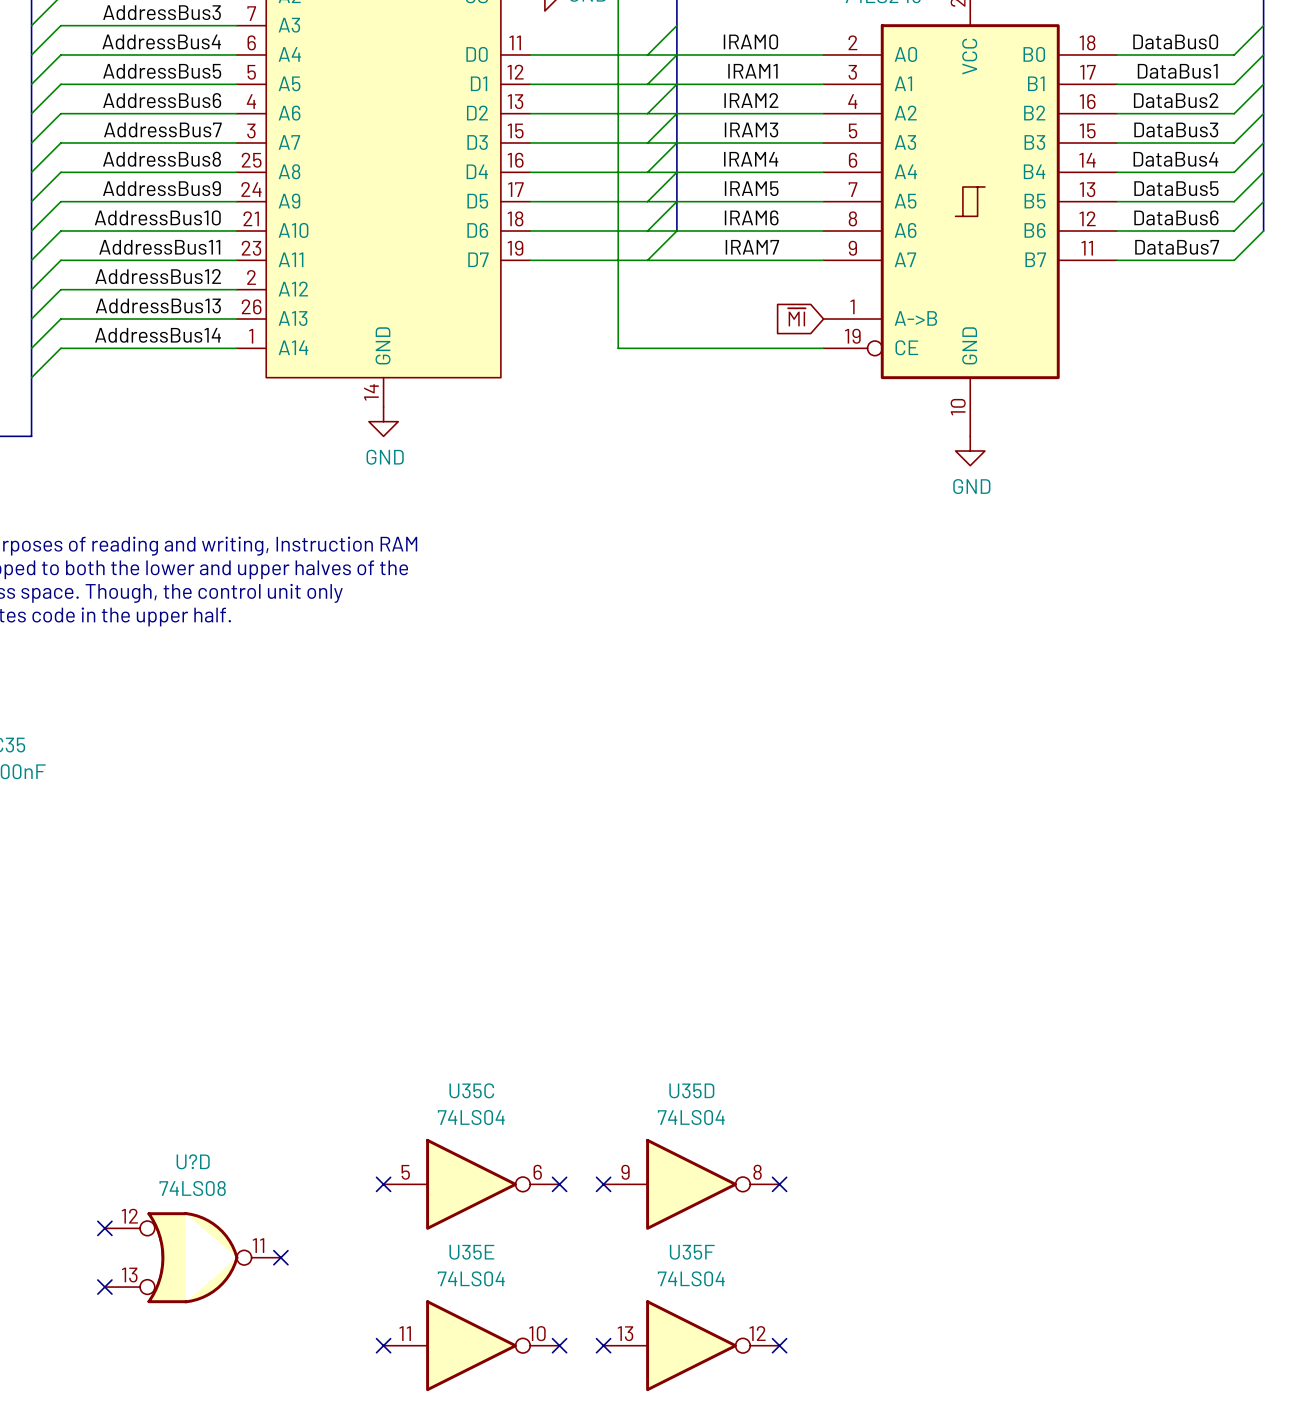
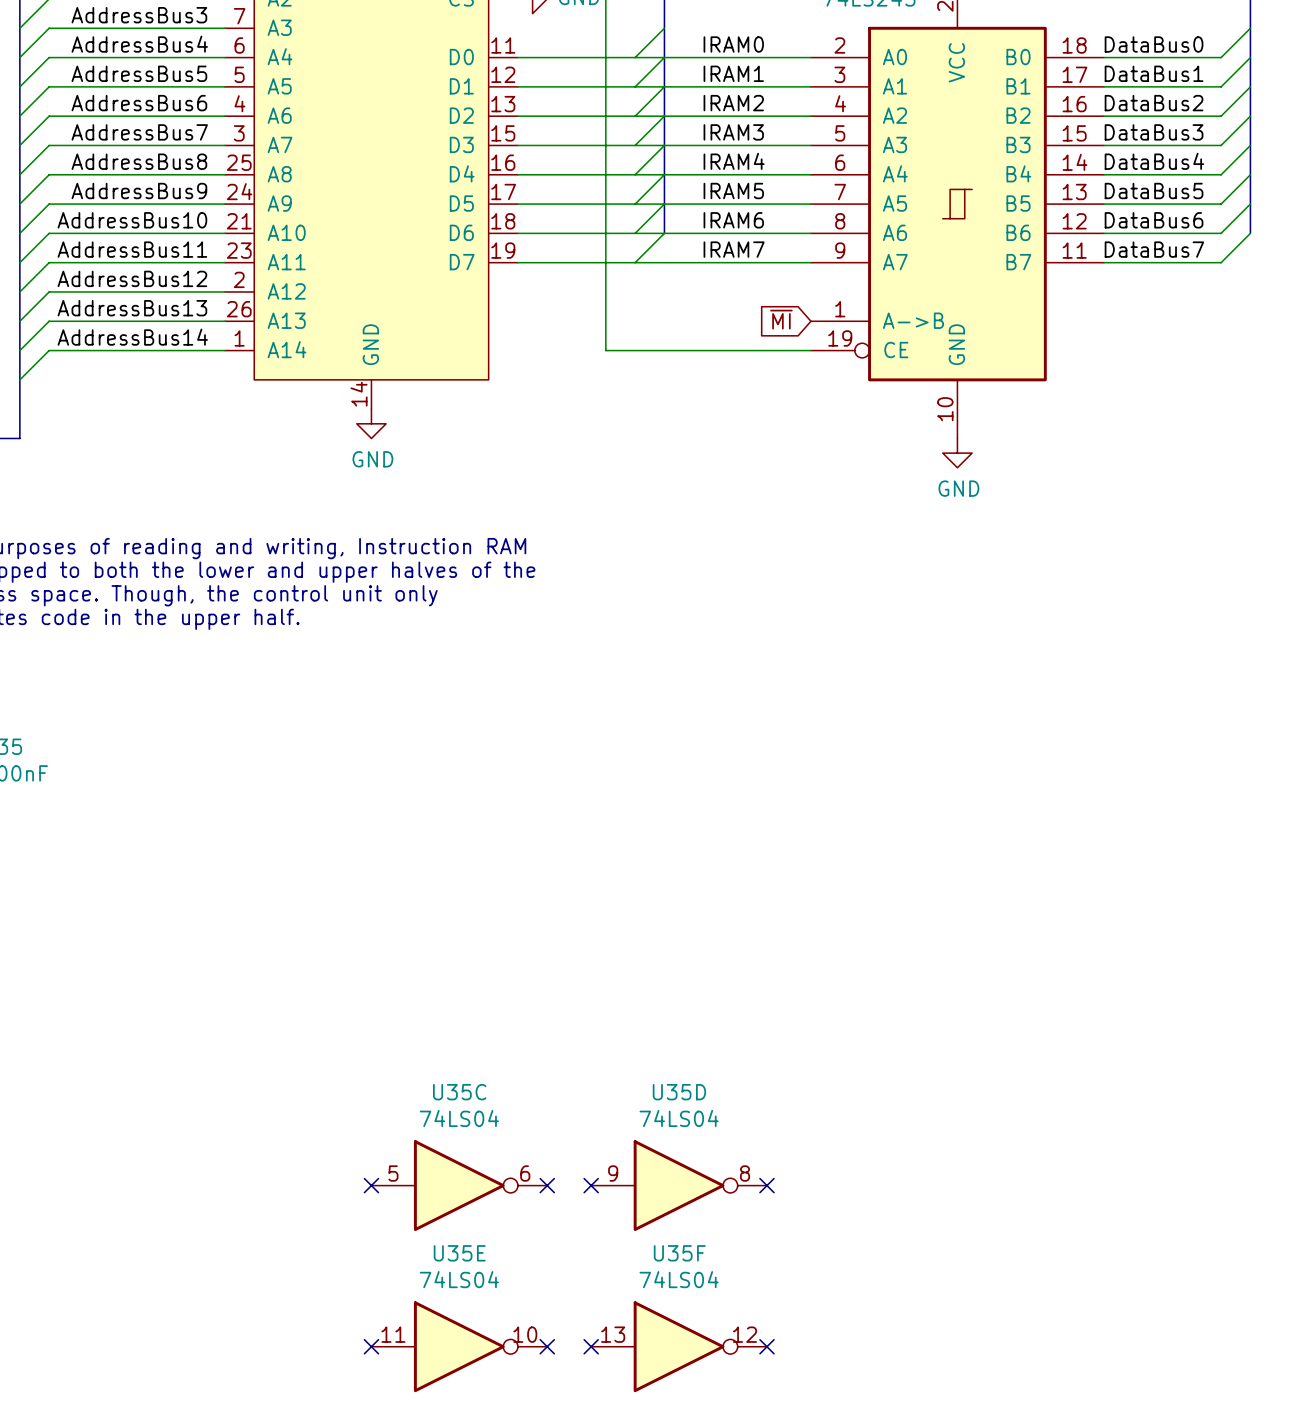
no-connect mark: (104, 1228) -> none
U?D: 74LS08 (192, 1257) -> none
no-connect mark: (280, 1257) -> none
no-connect mark: (104, 1287) -> none

